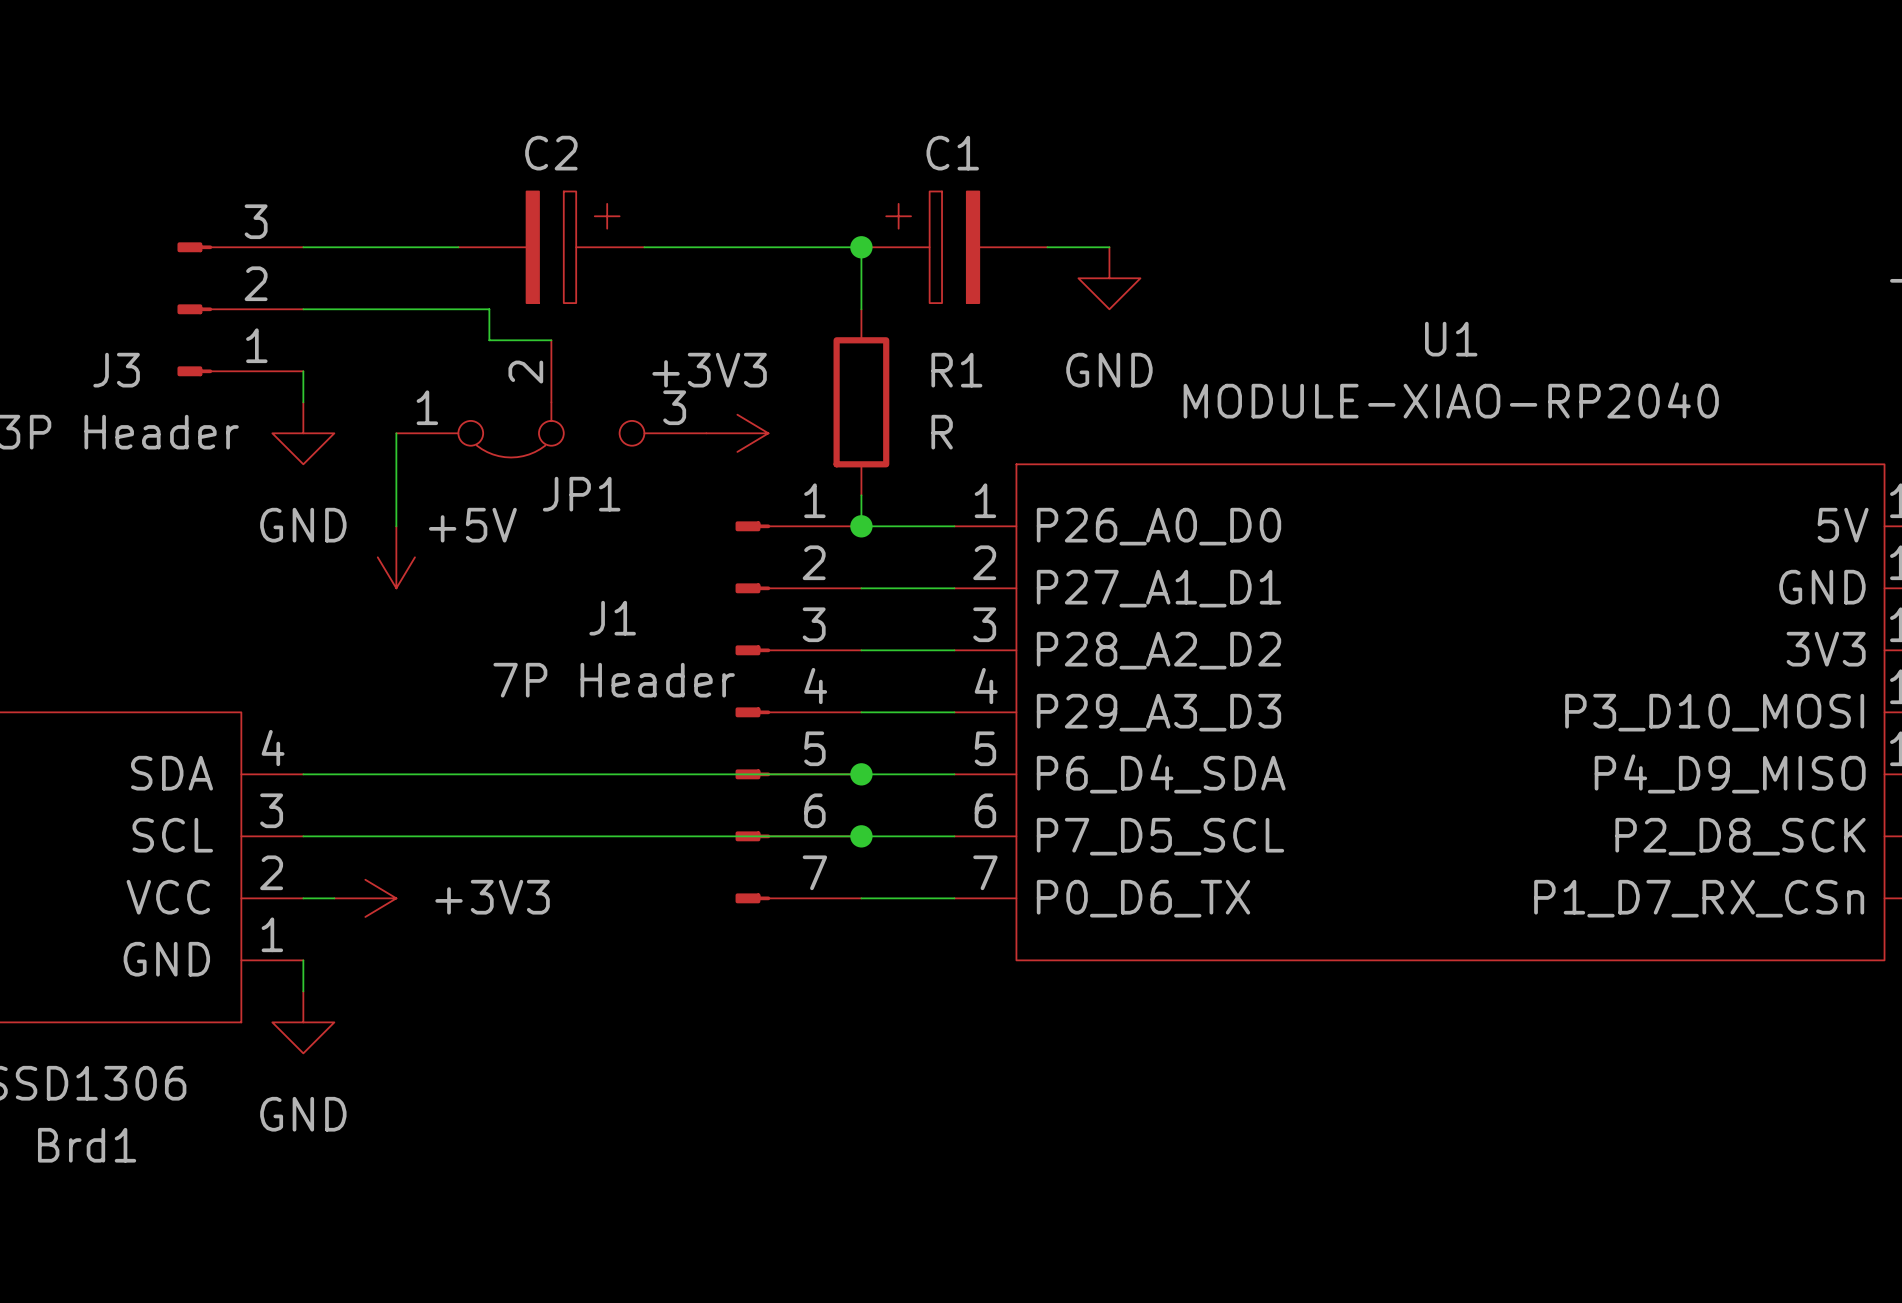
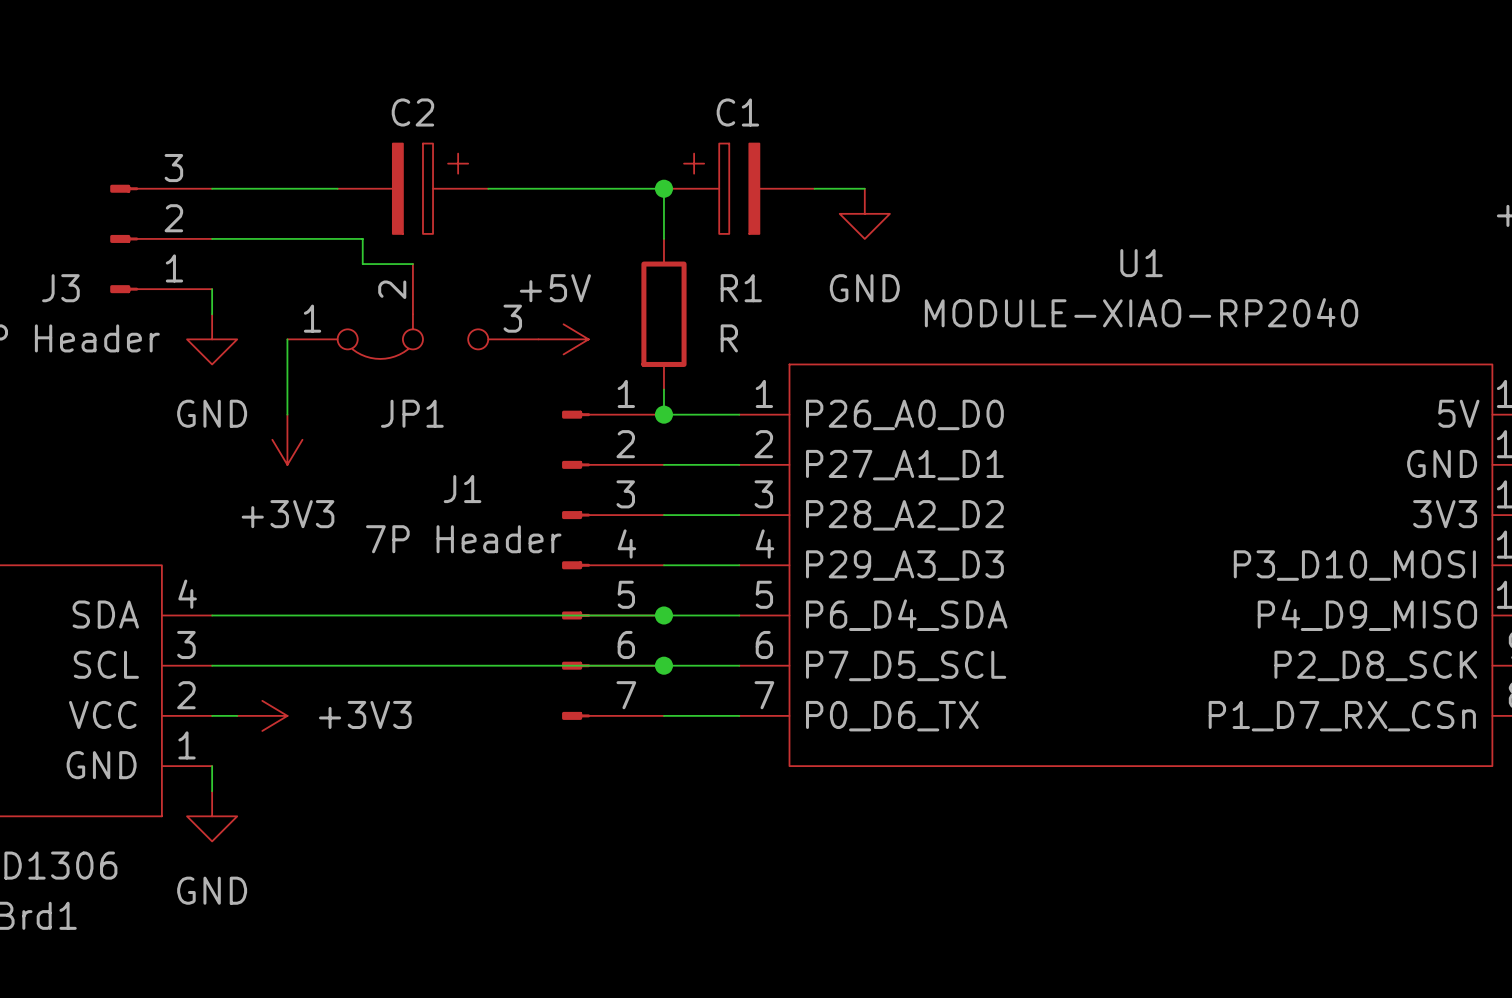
power symbol: +3V3 (737, 433) -> +5V (563, 339)
JP1 name position: JP1 (581, 494) -> JP1 (412, 413)
power symbol: +5V (396, 557) -> +3V3 (287, 439)

